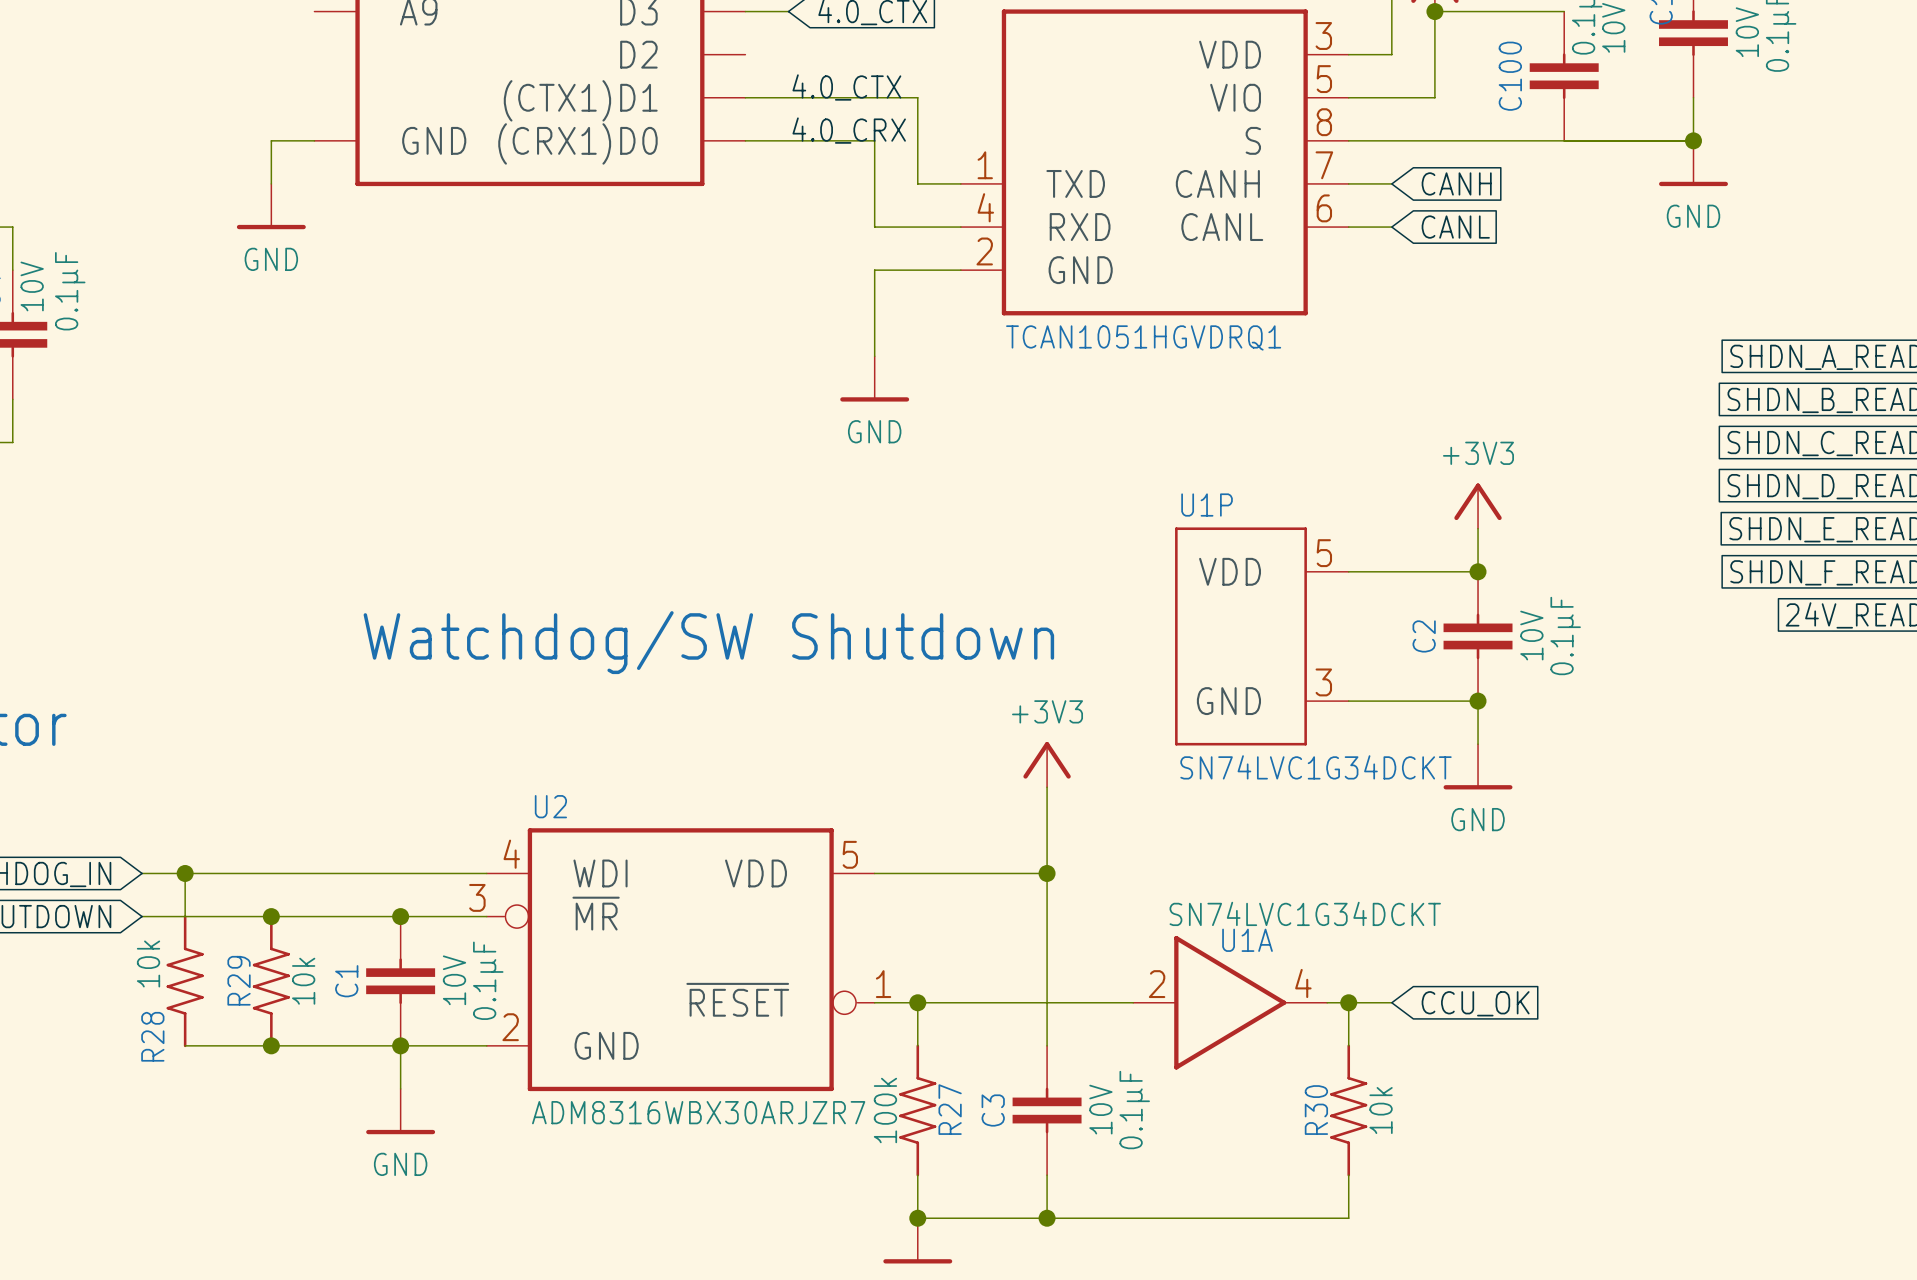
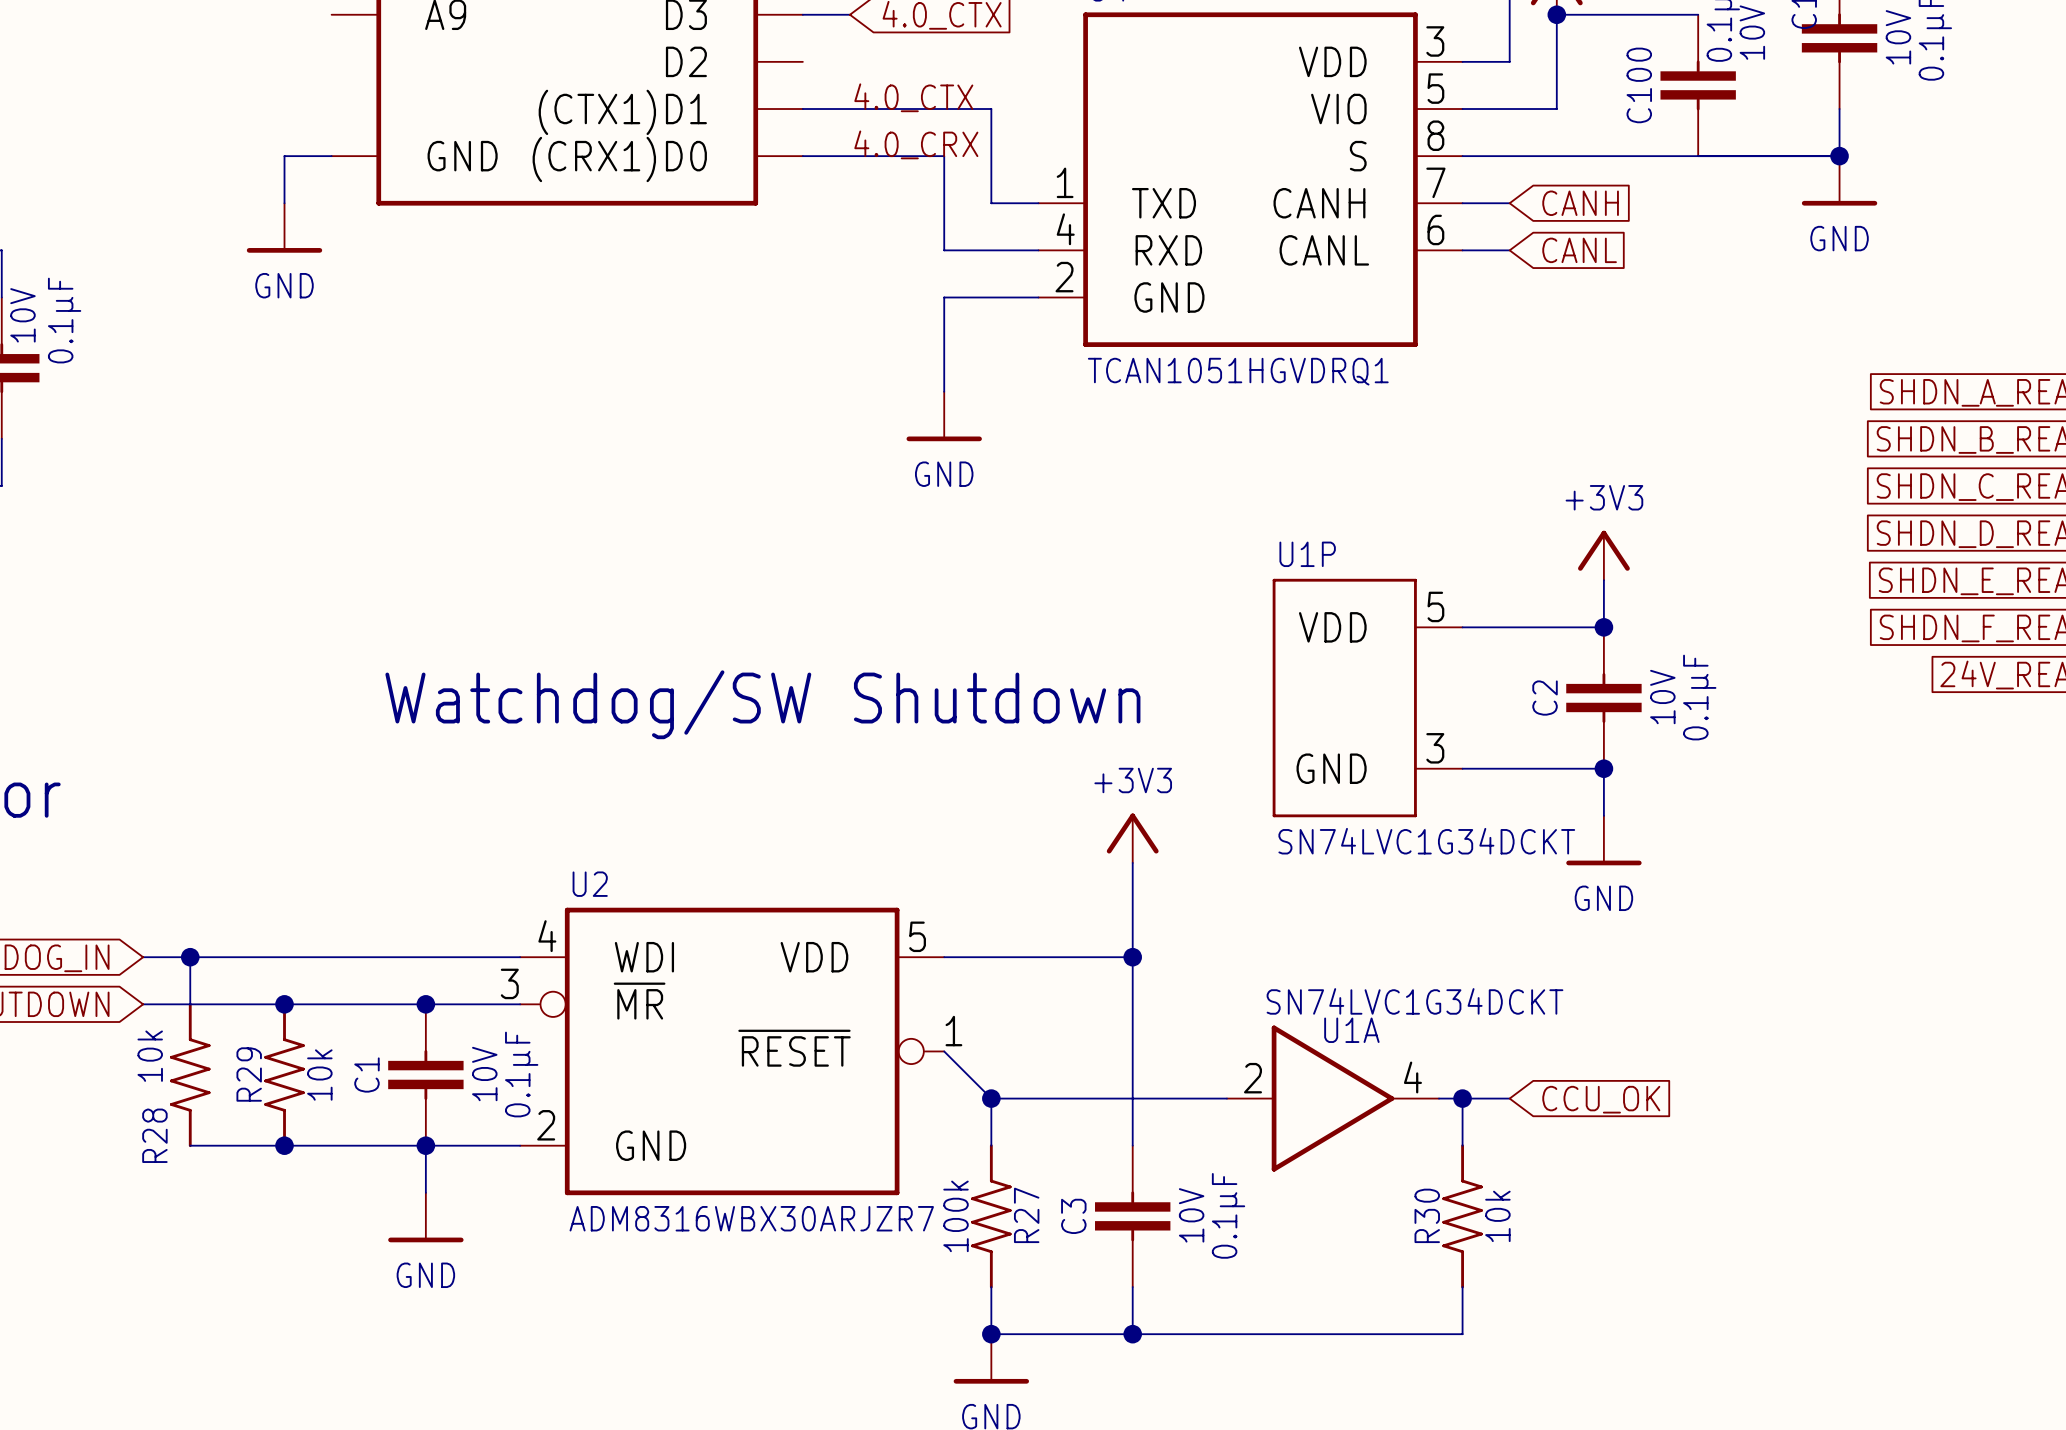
U2 symbol: [486, 828, 875, 1092] -> [520, 907, 945, 1196]
wire: (874, 1002) (917, 1002) -> (944, 1051) (991, 1098)

